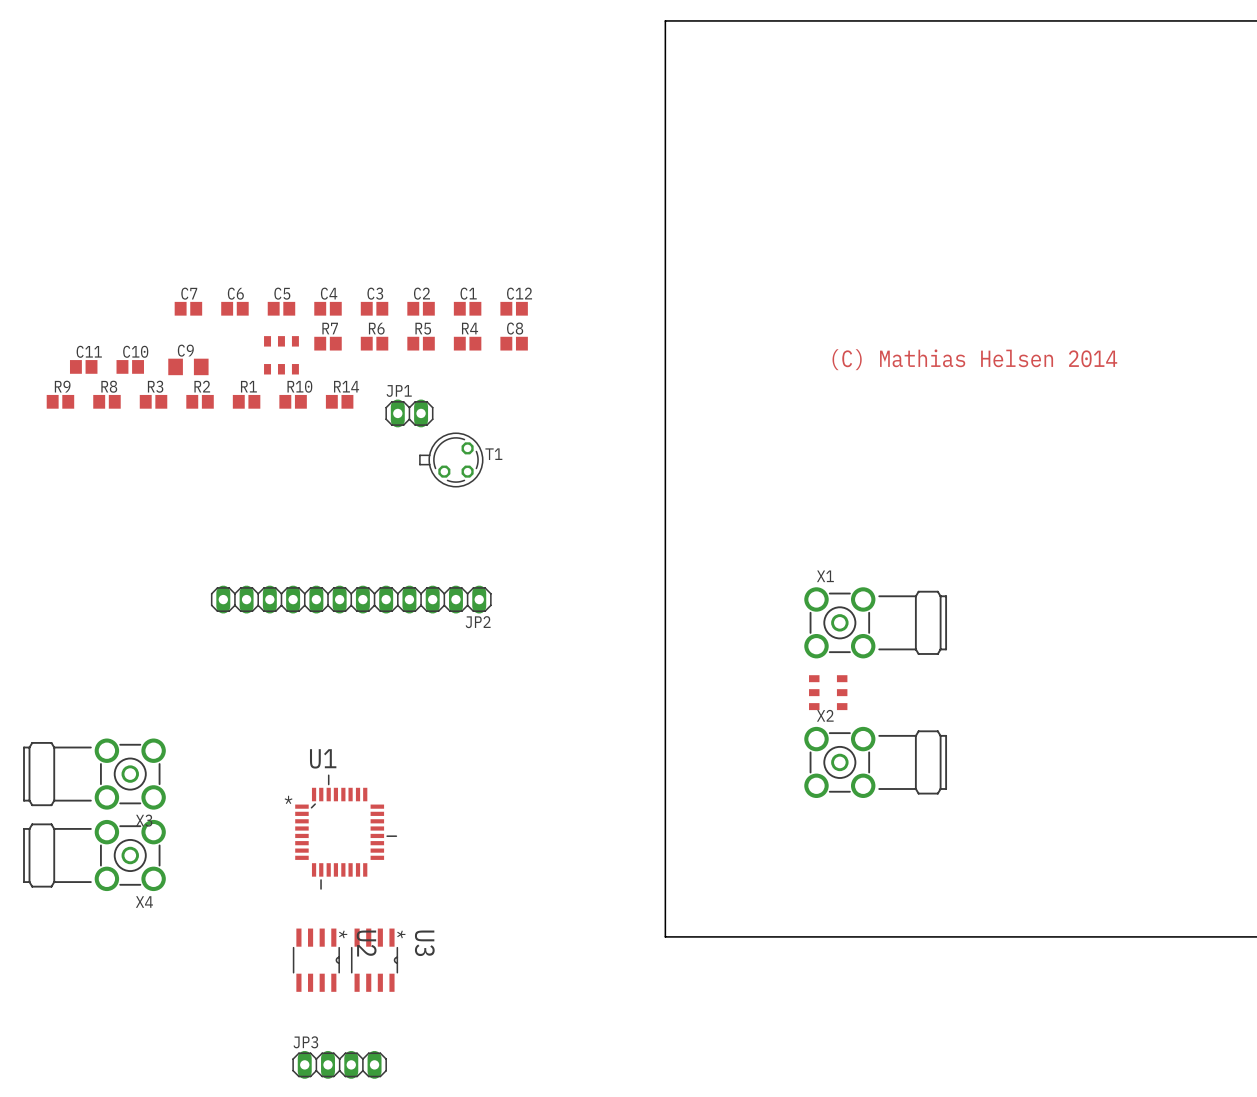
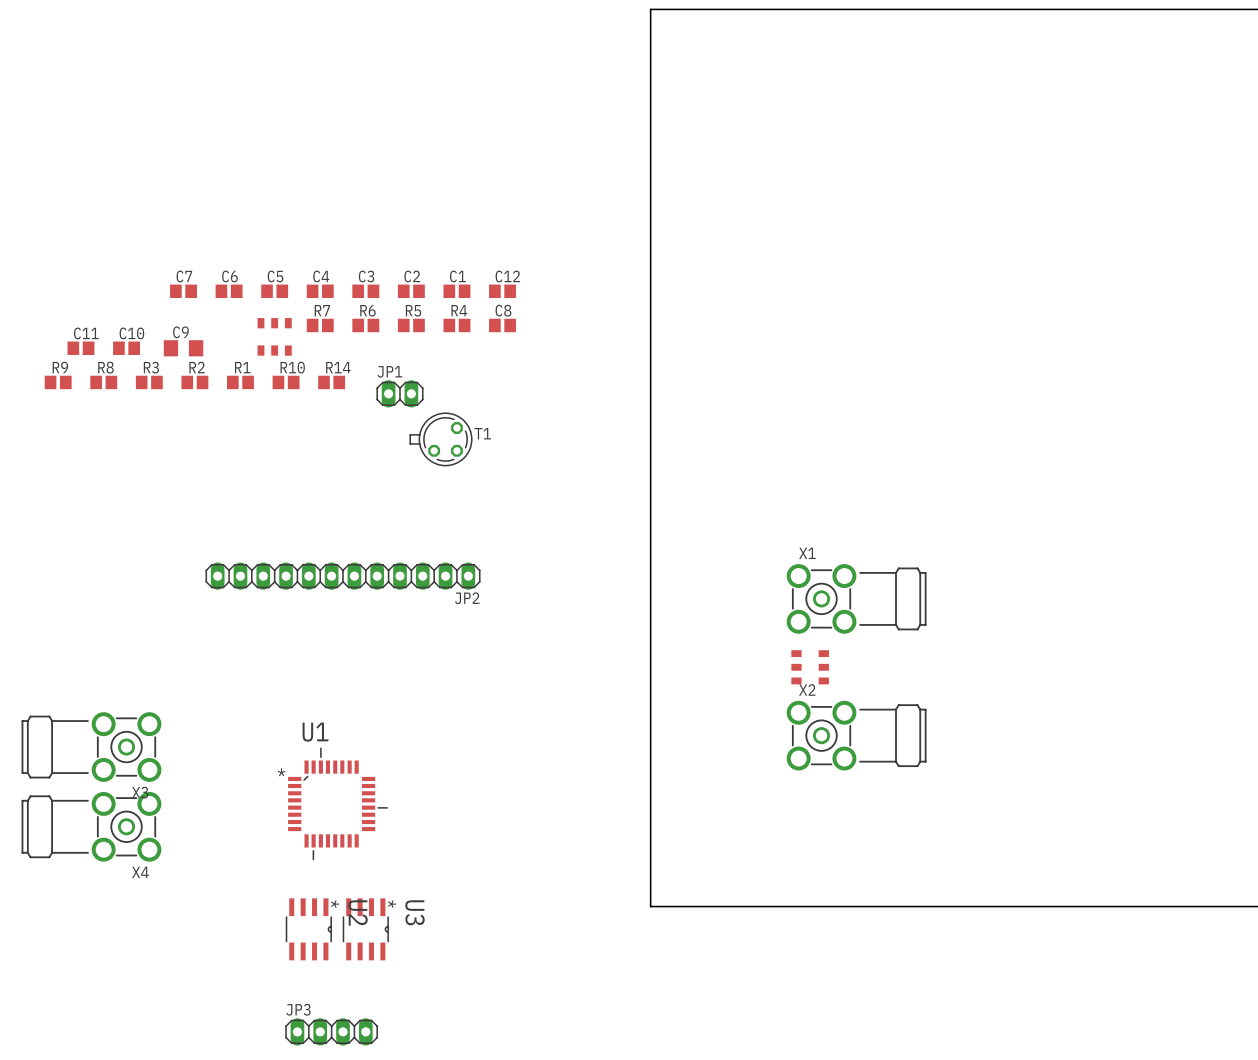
text: (C) Mathias Helsen 2014 (974, 359) -> none

